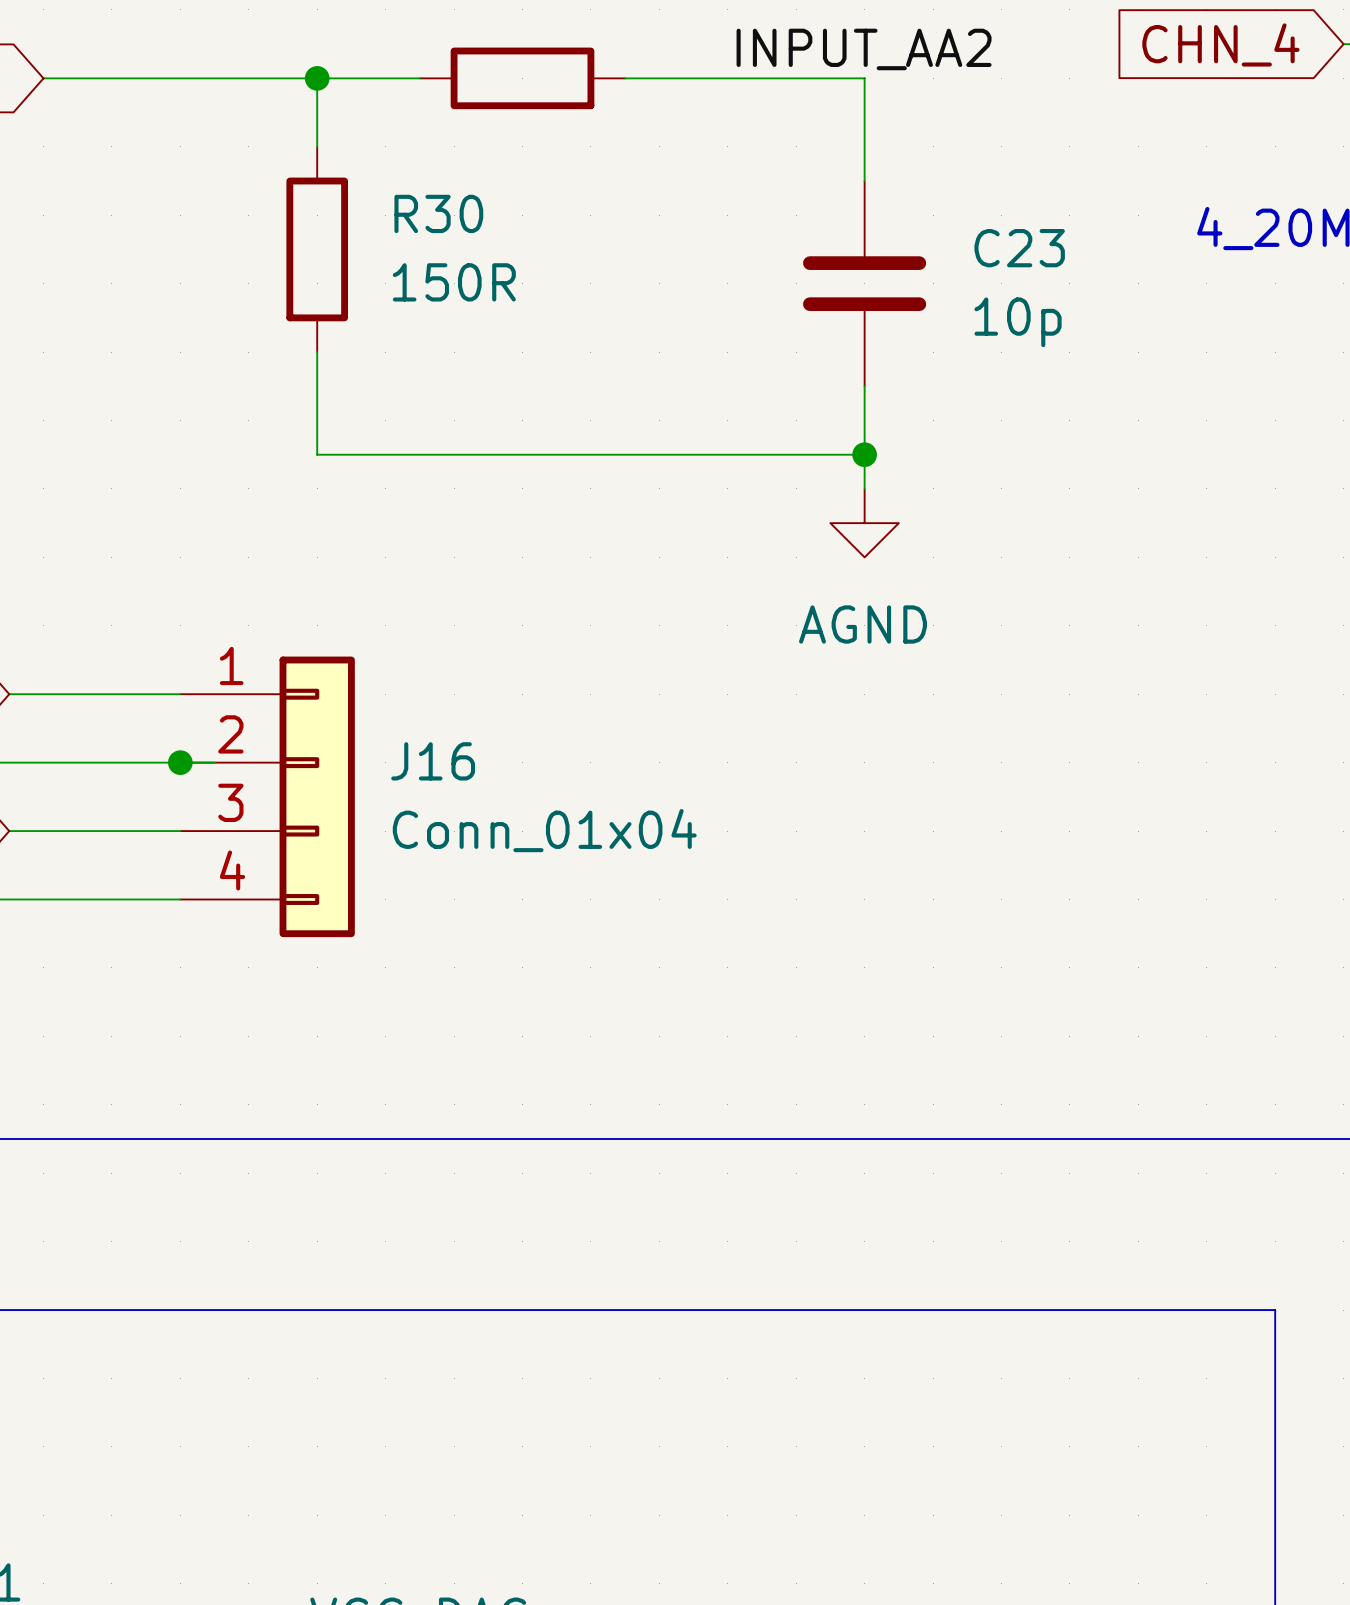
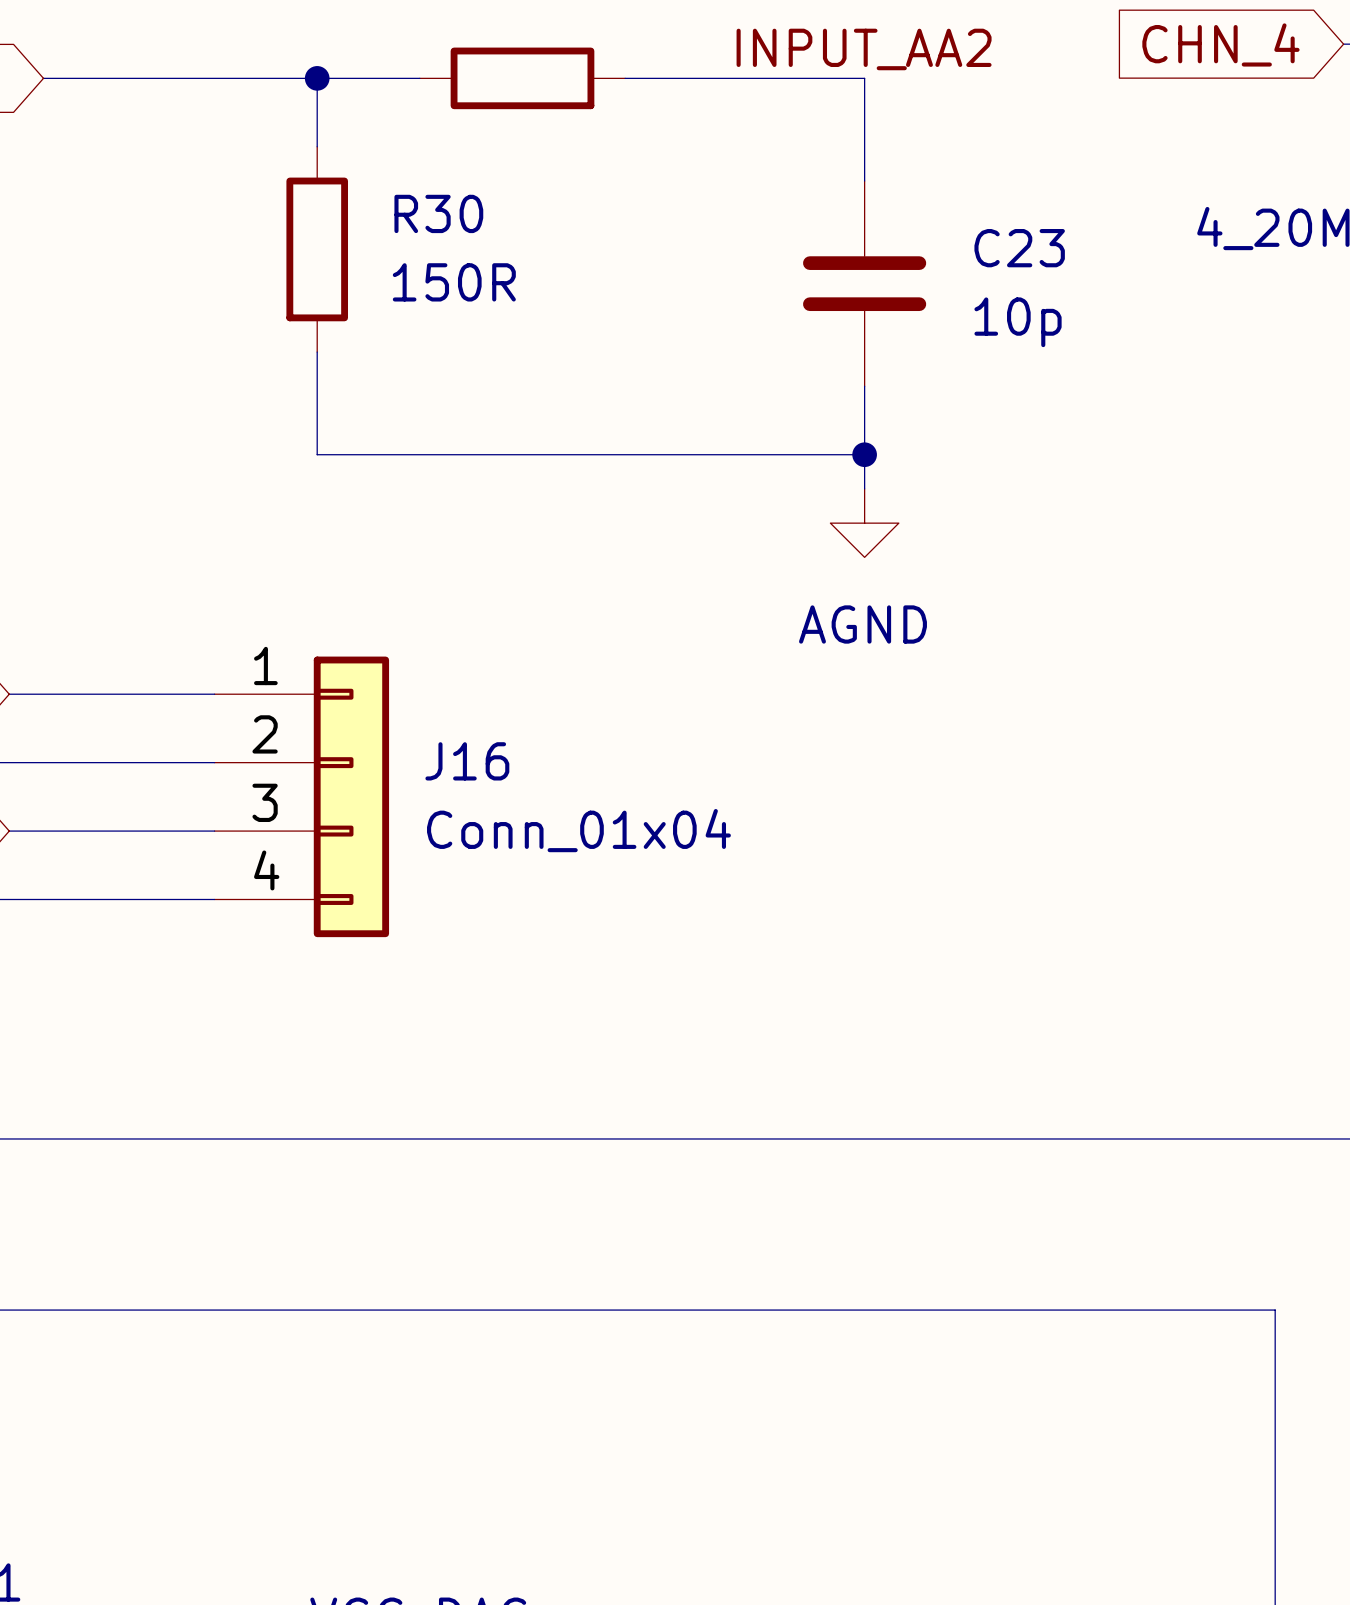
junction: (180, 762) -> none
J16 position: (267, 796) -> (301, 796)

